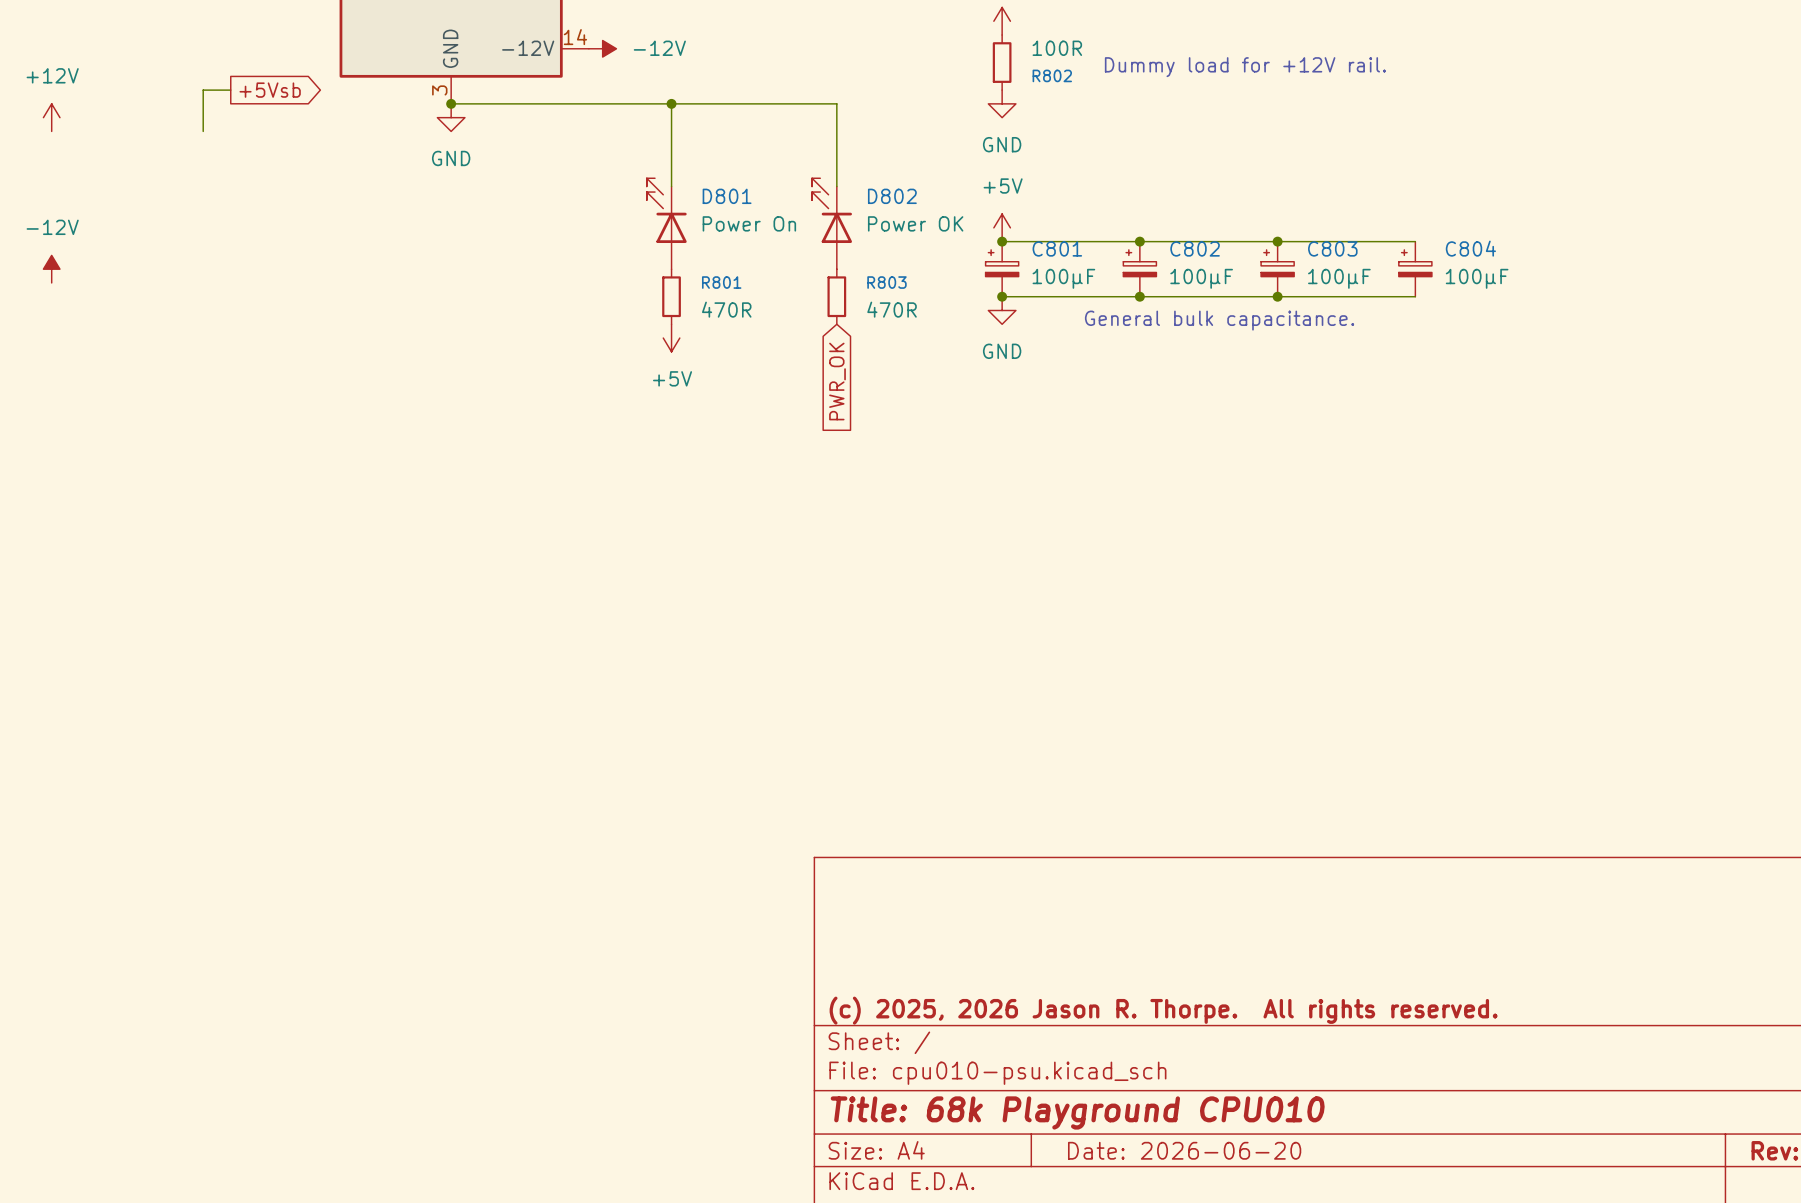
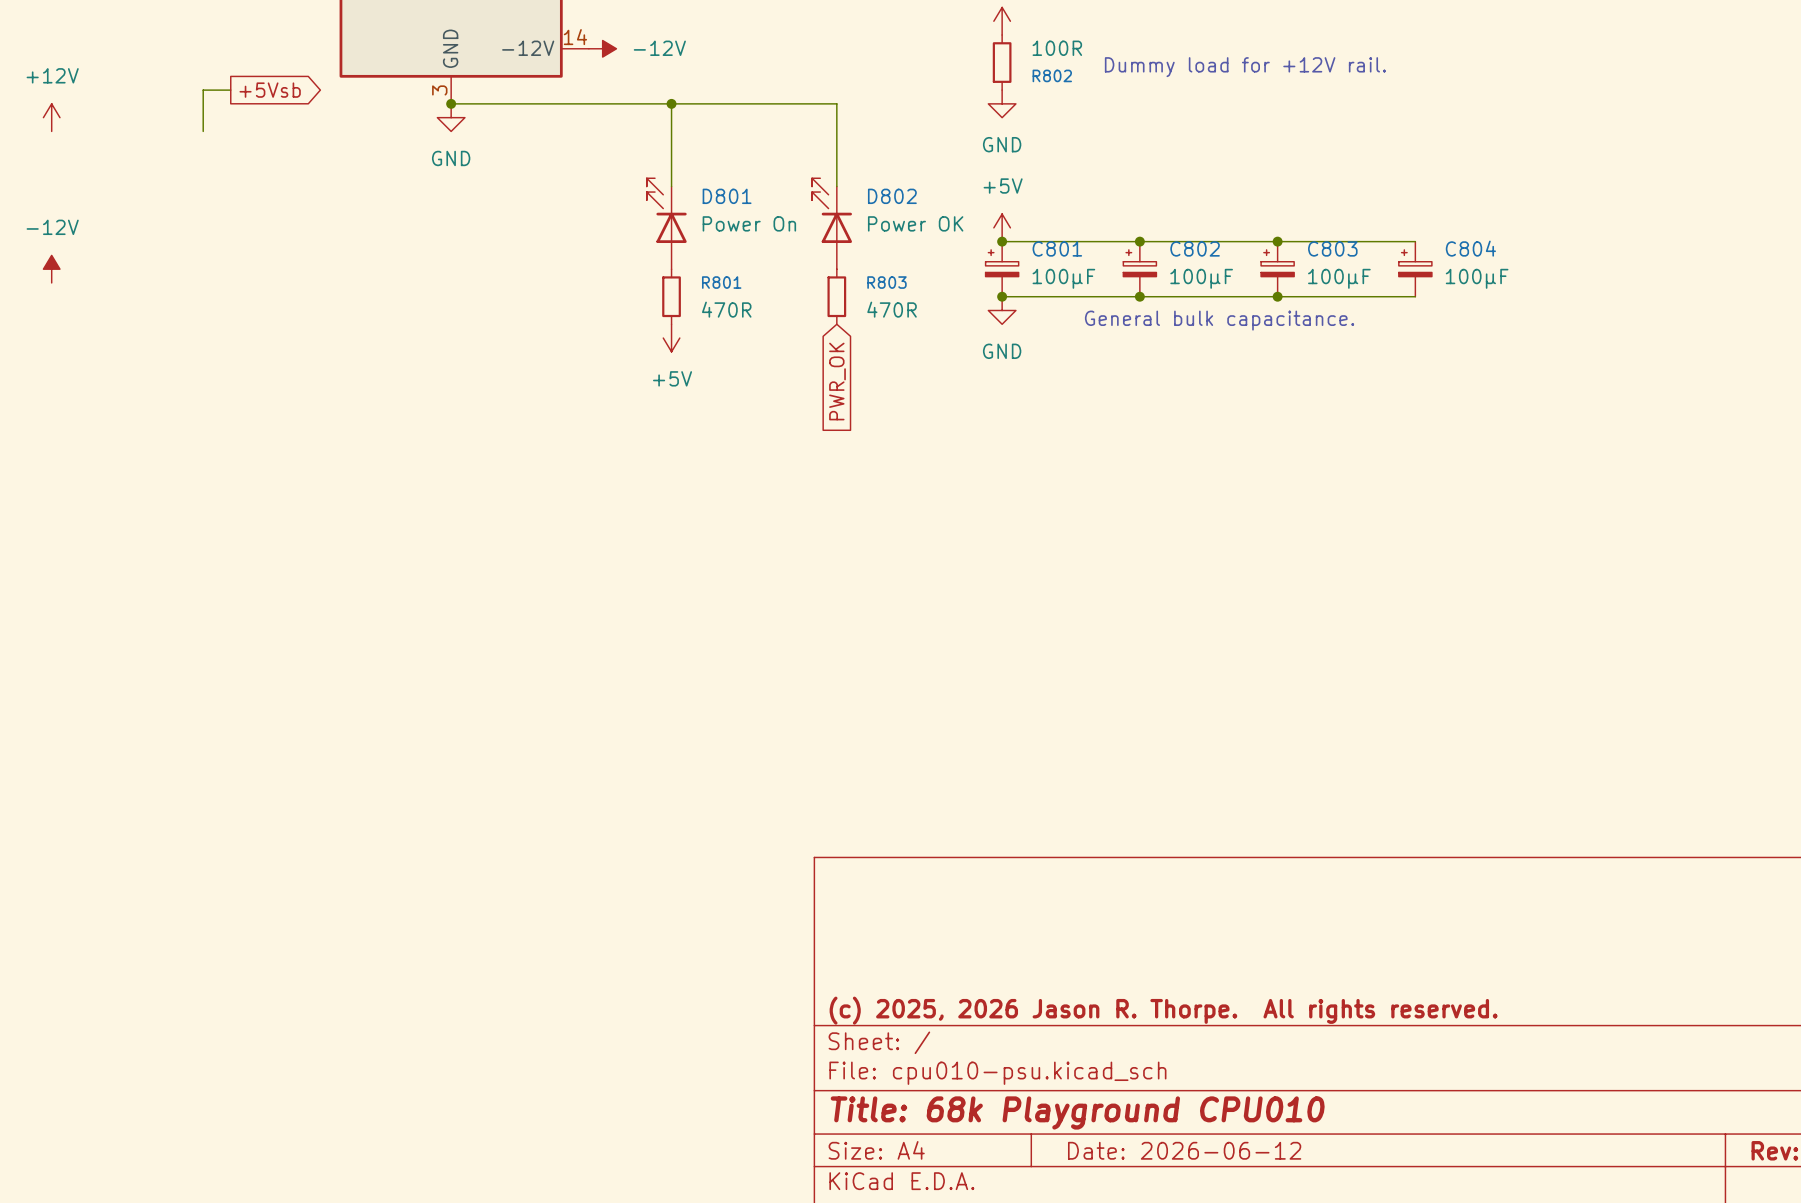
title block: Date: 2026-06-20 (1184, 1150) -> Date: 2026-06-12 (1184, 1150)

